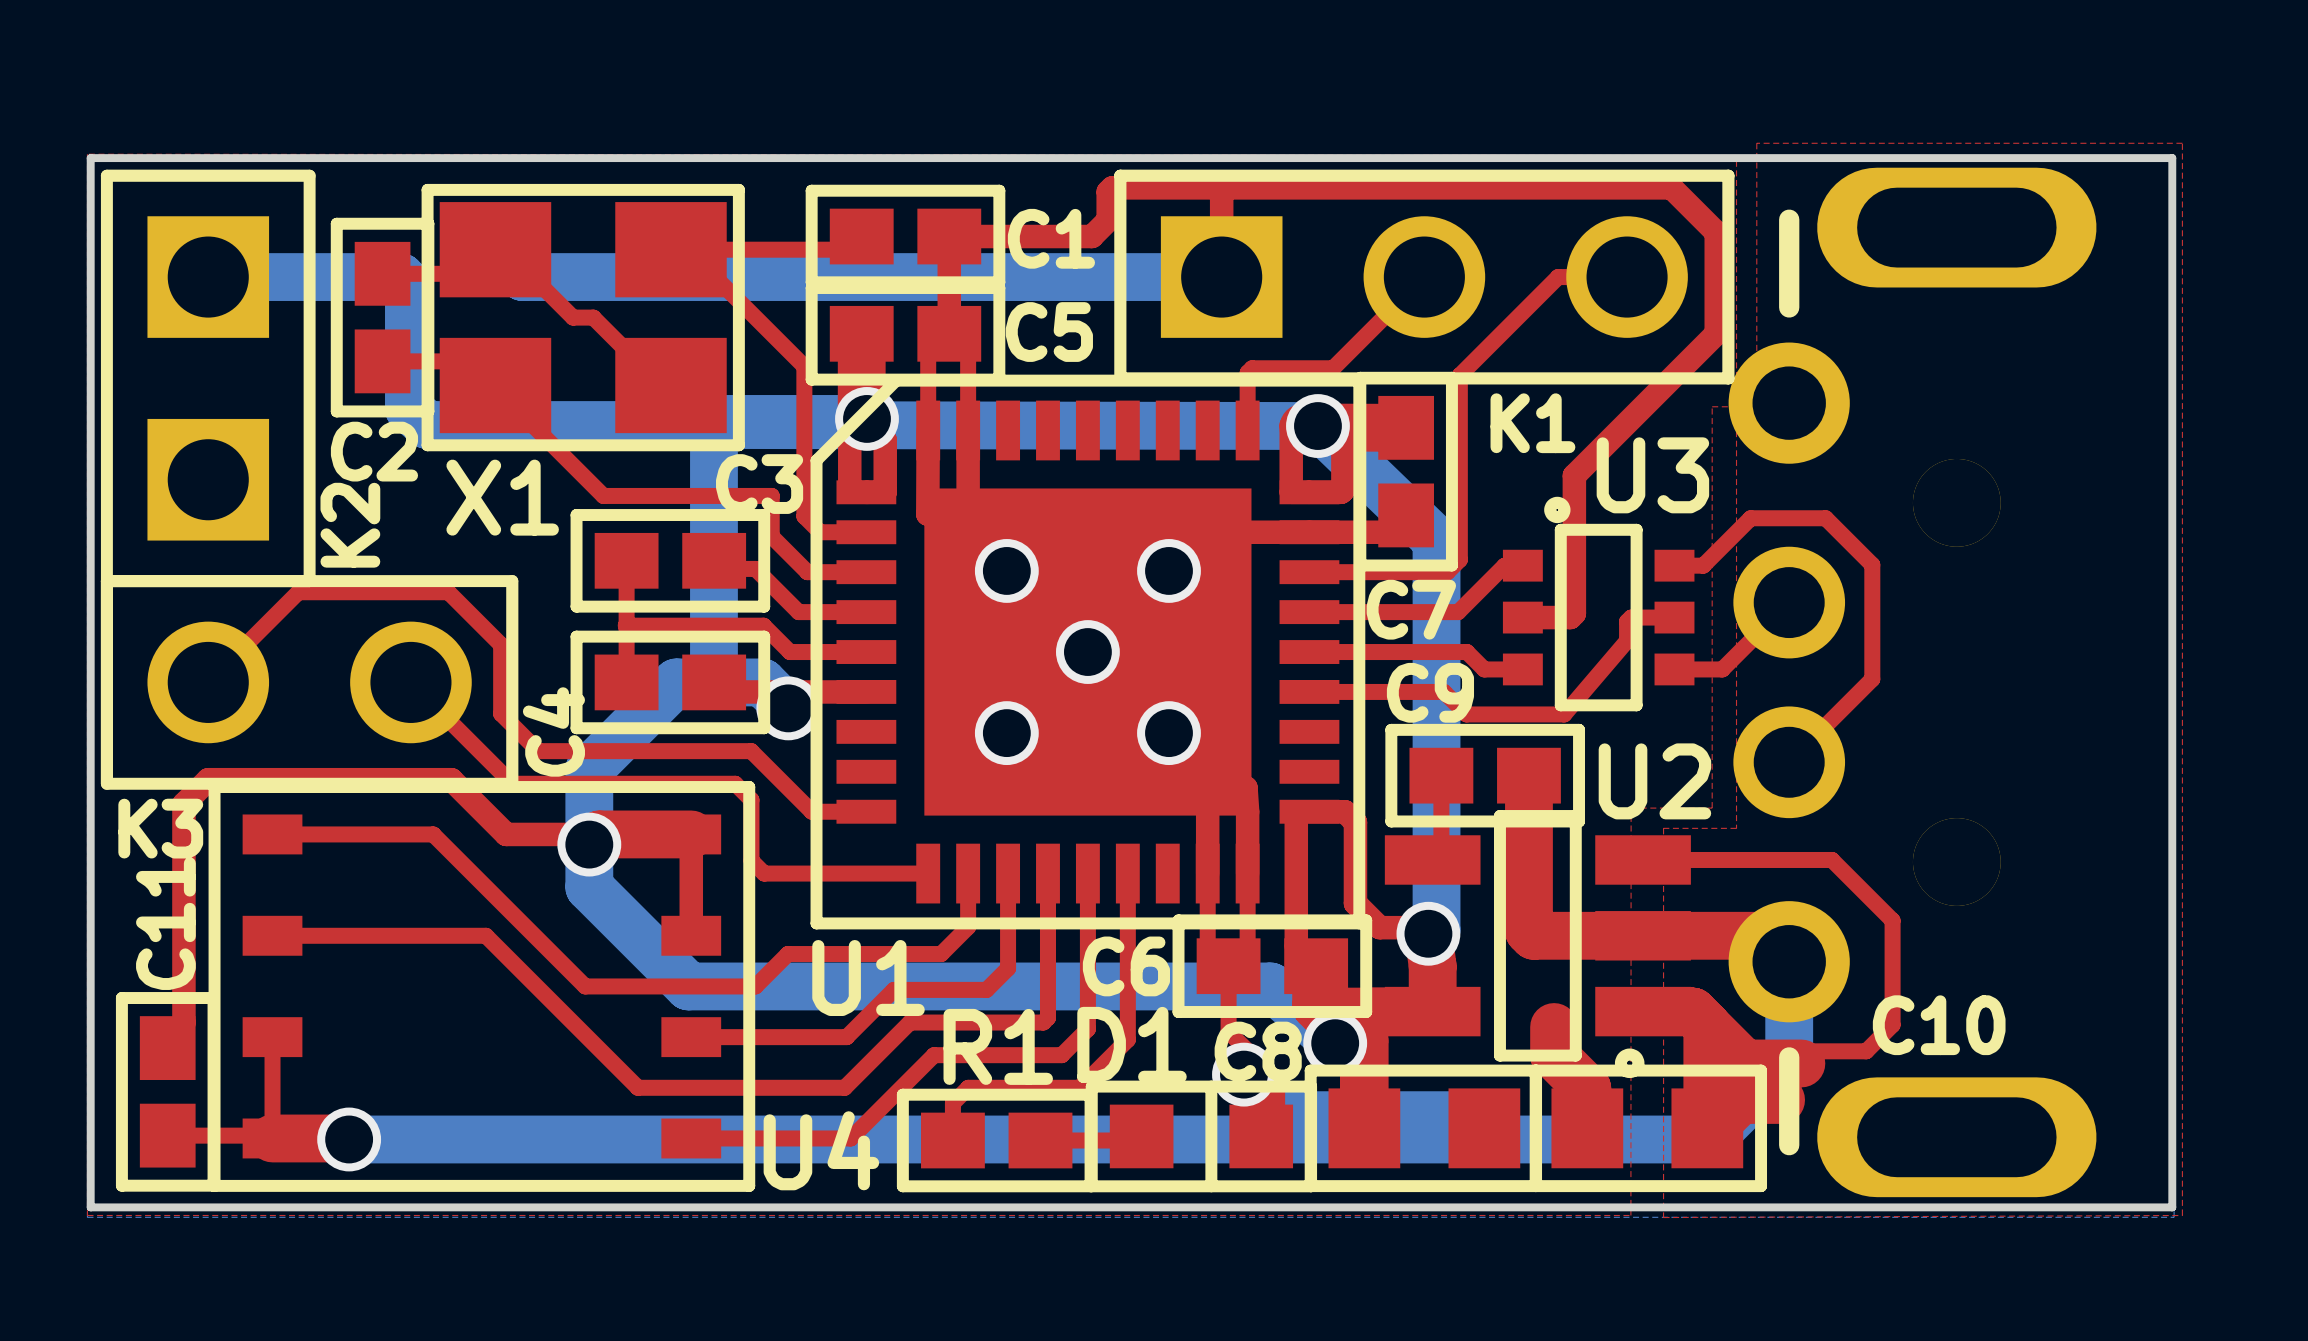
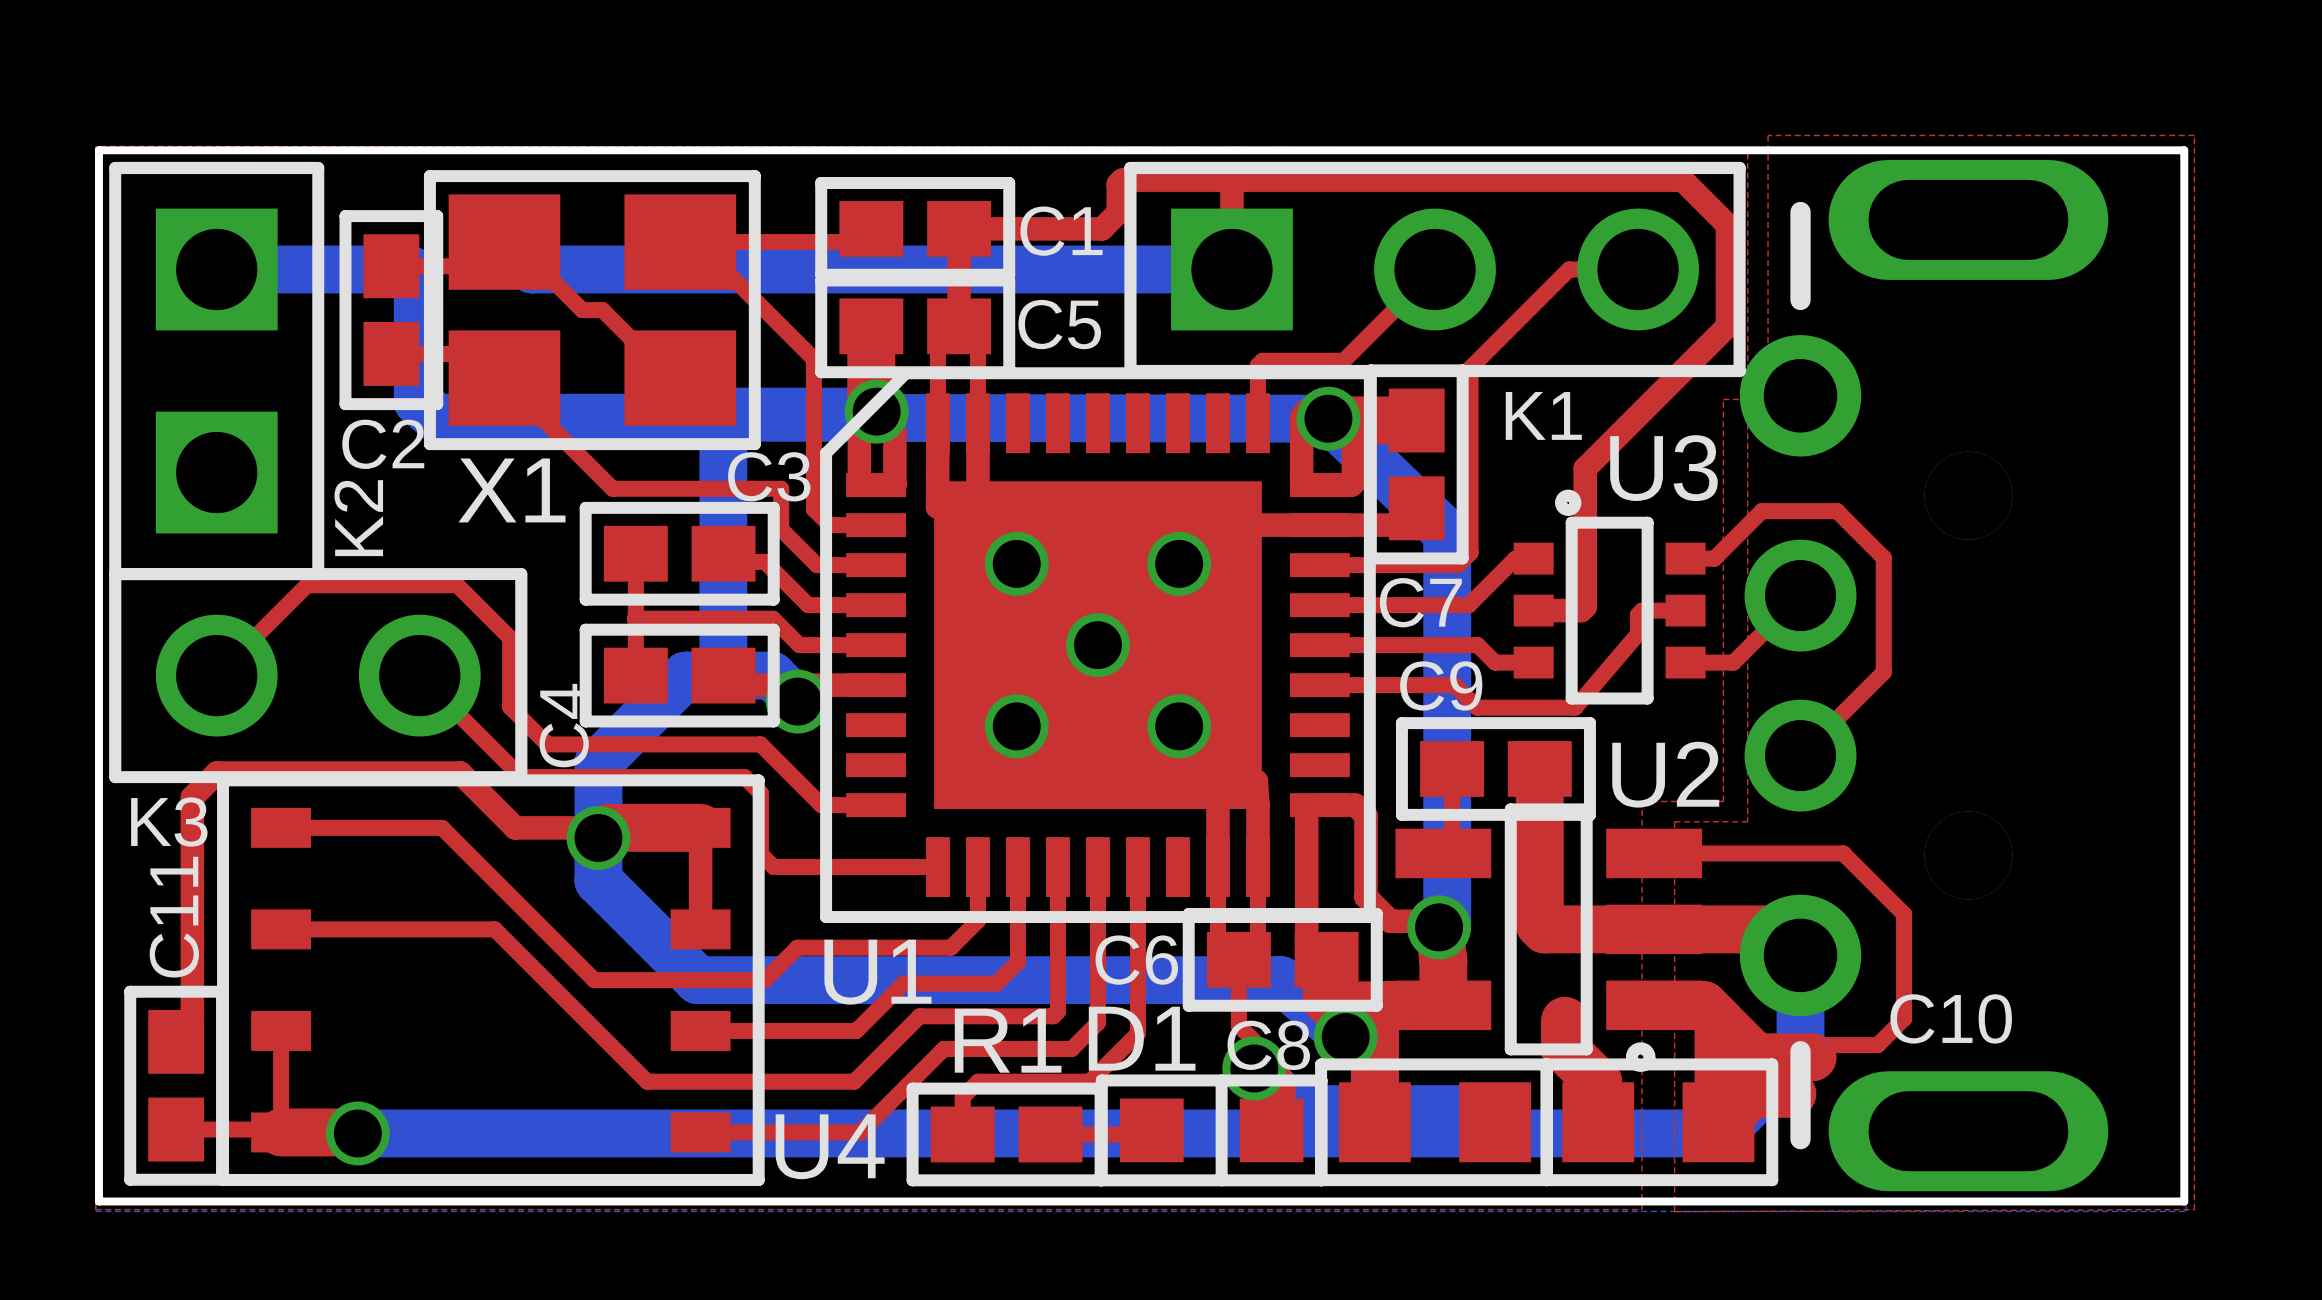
X1 footprint: [421, 183, 745, 452] -> [423, 170, 761, 451]

